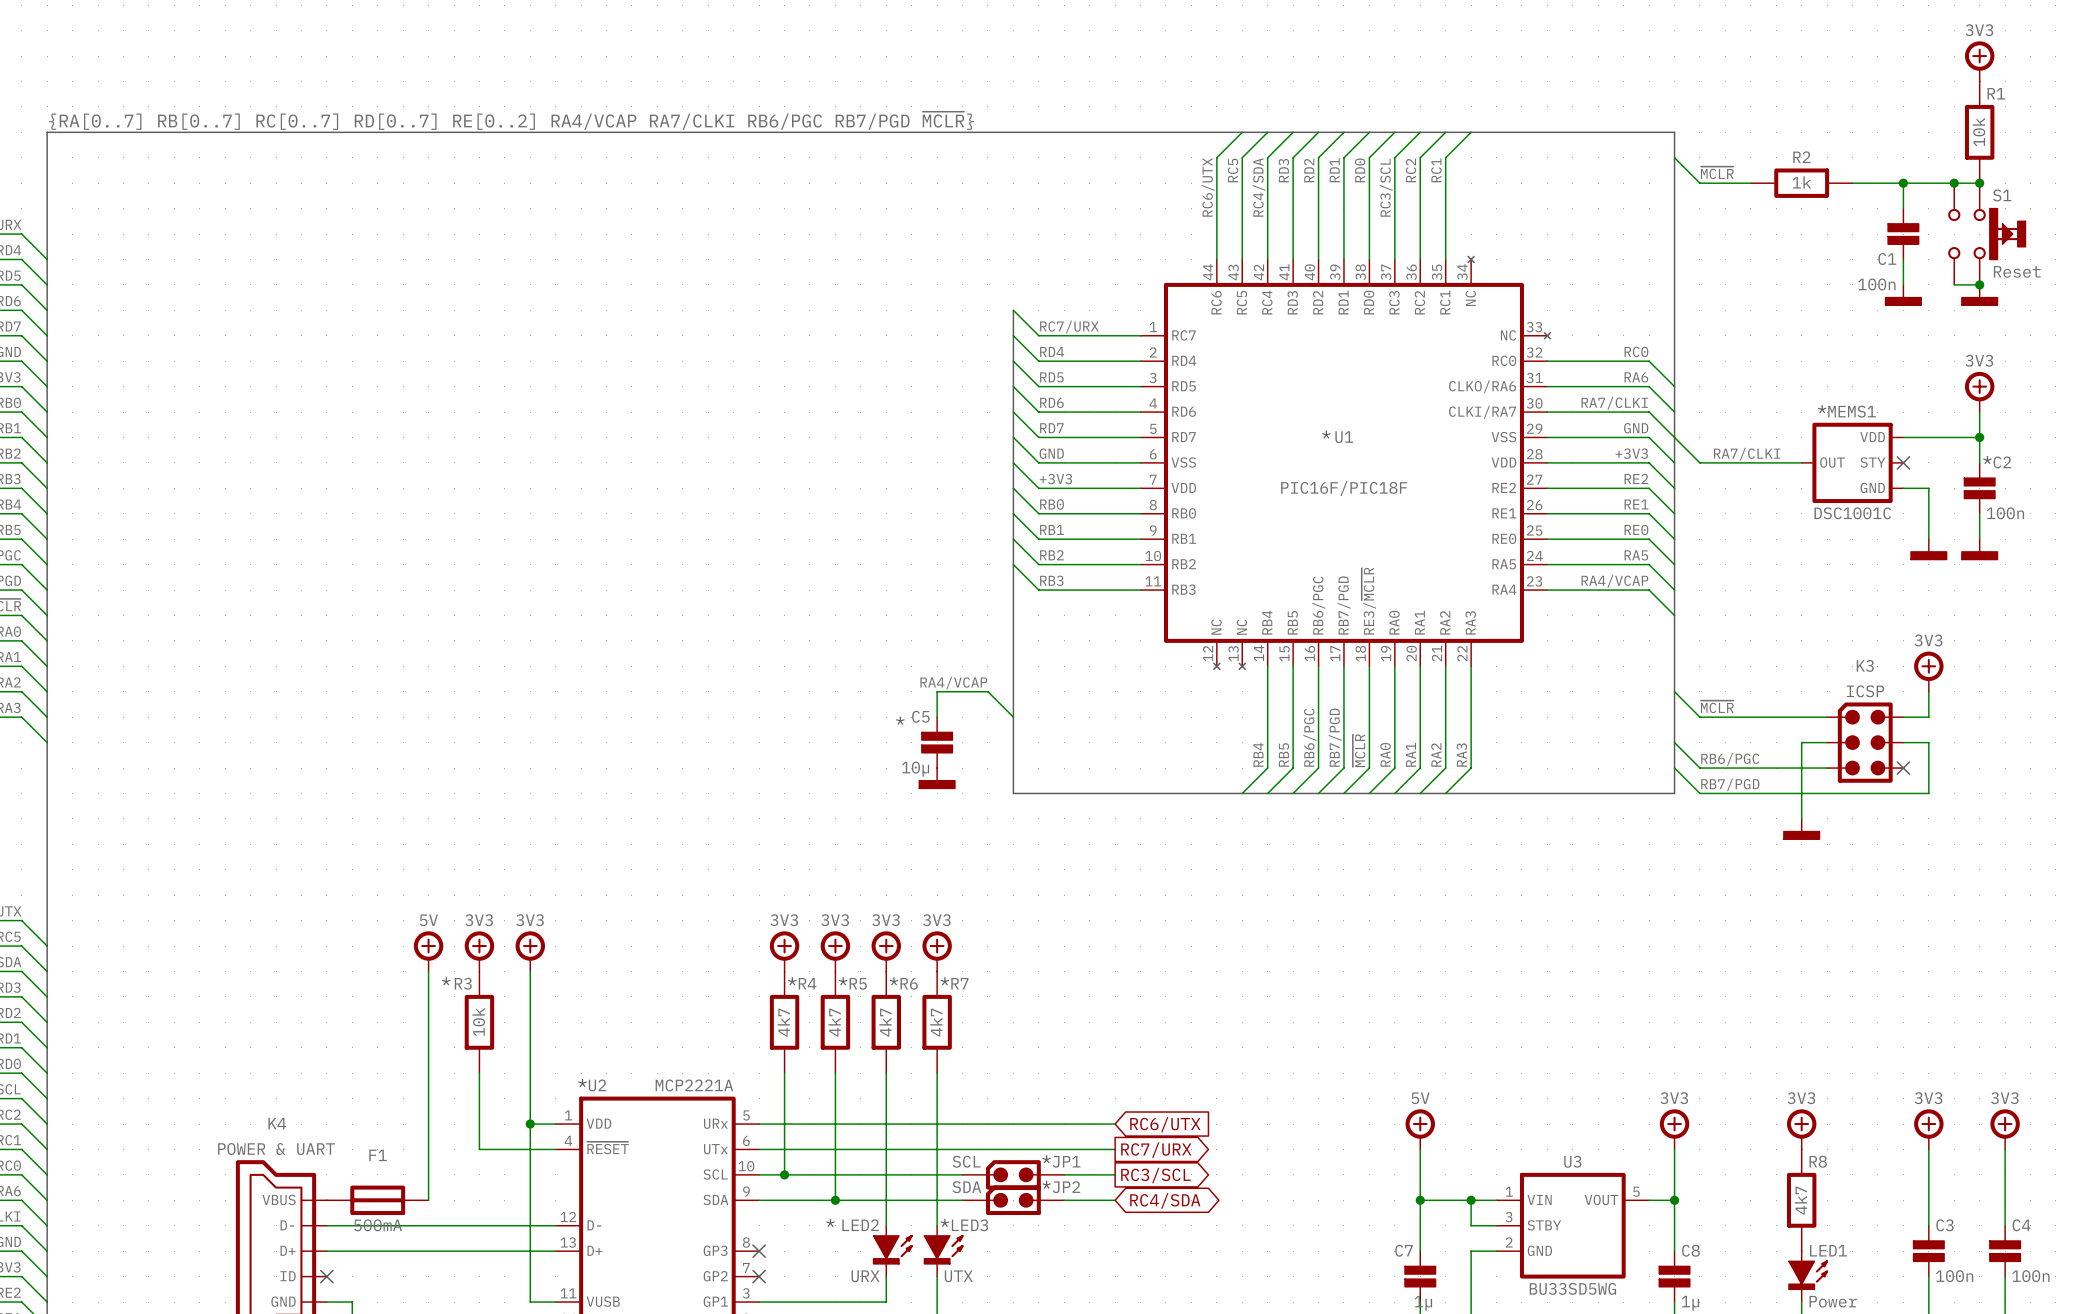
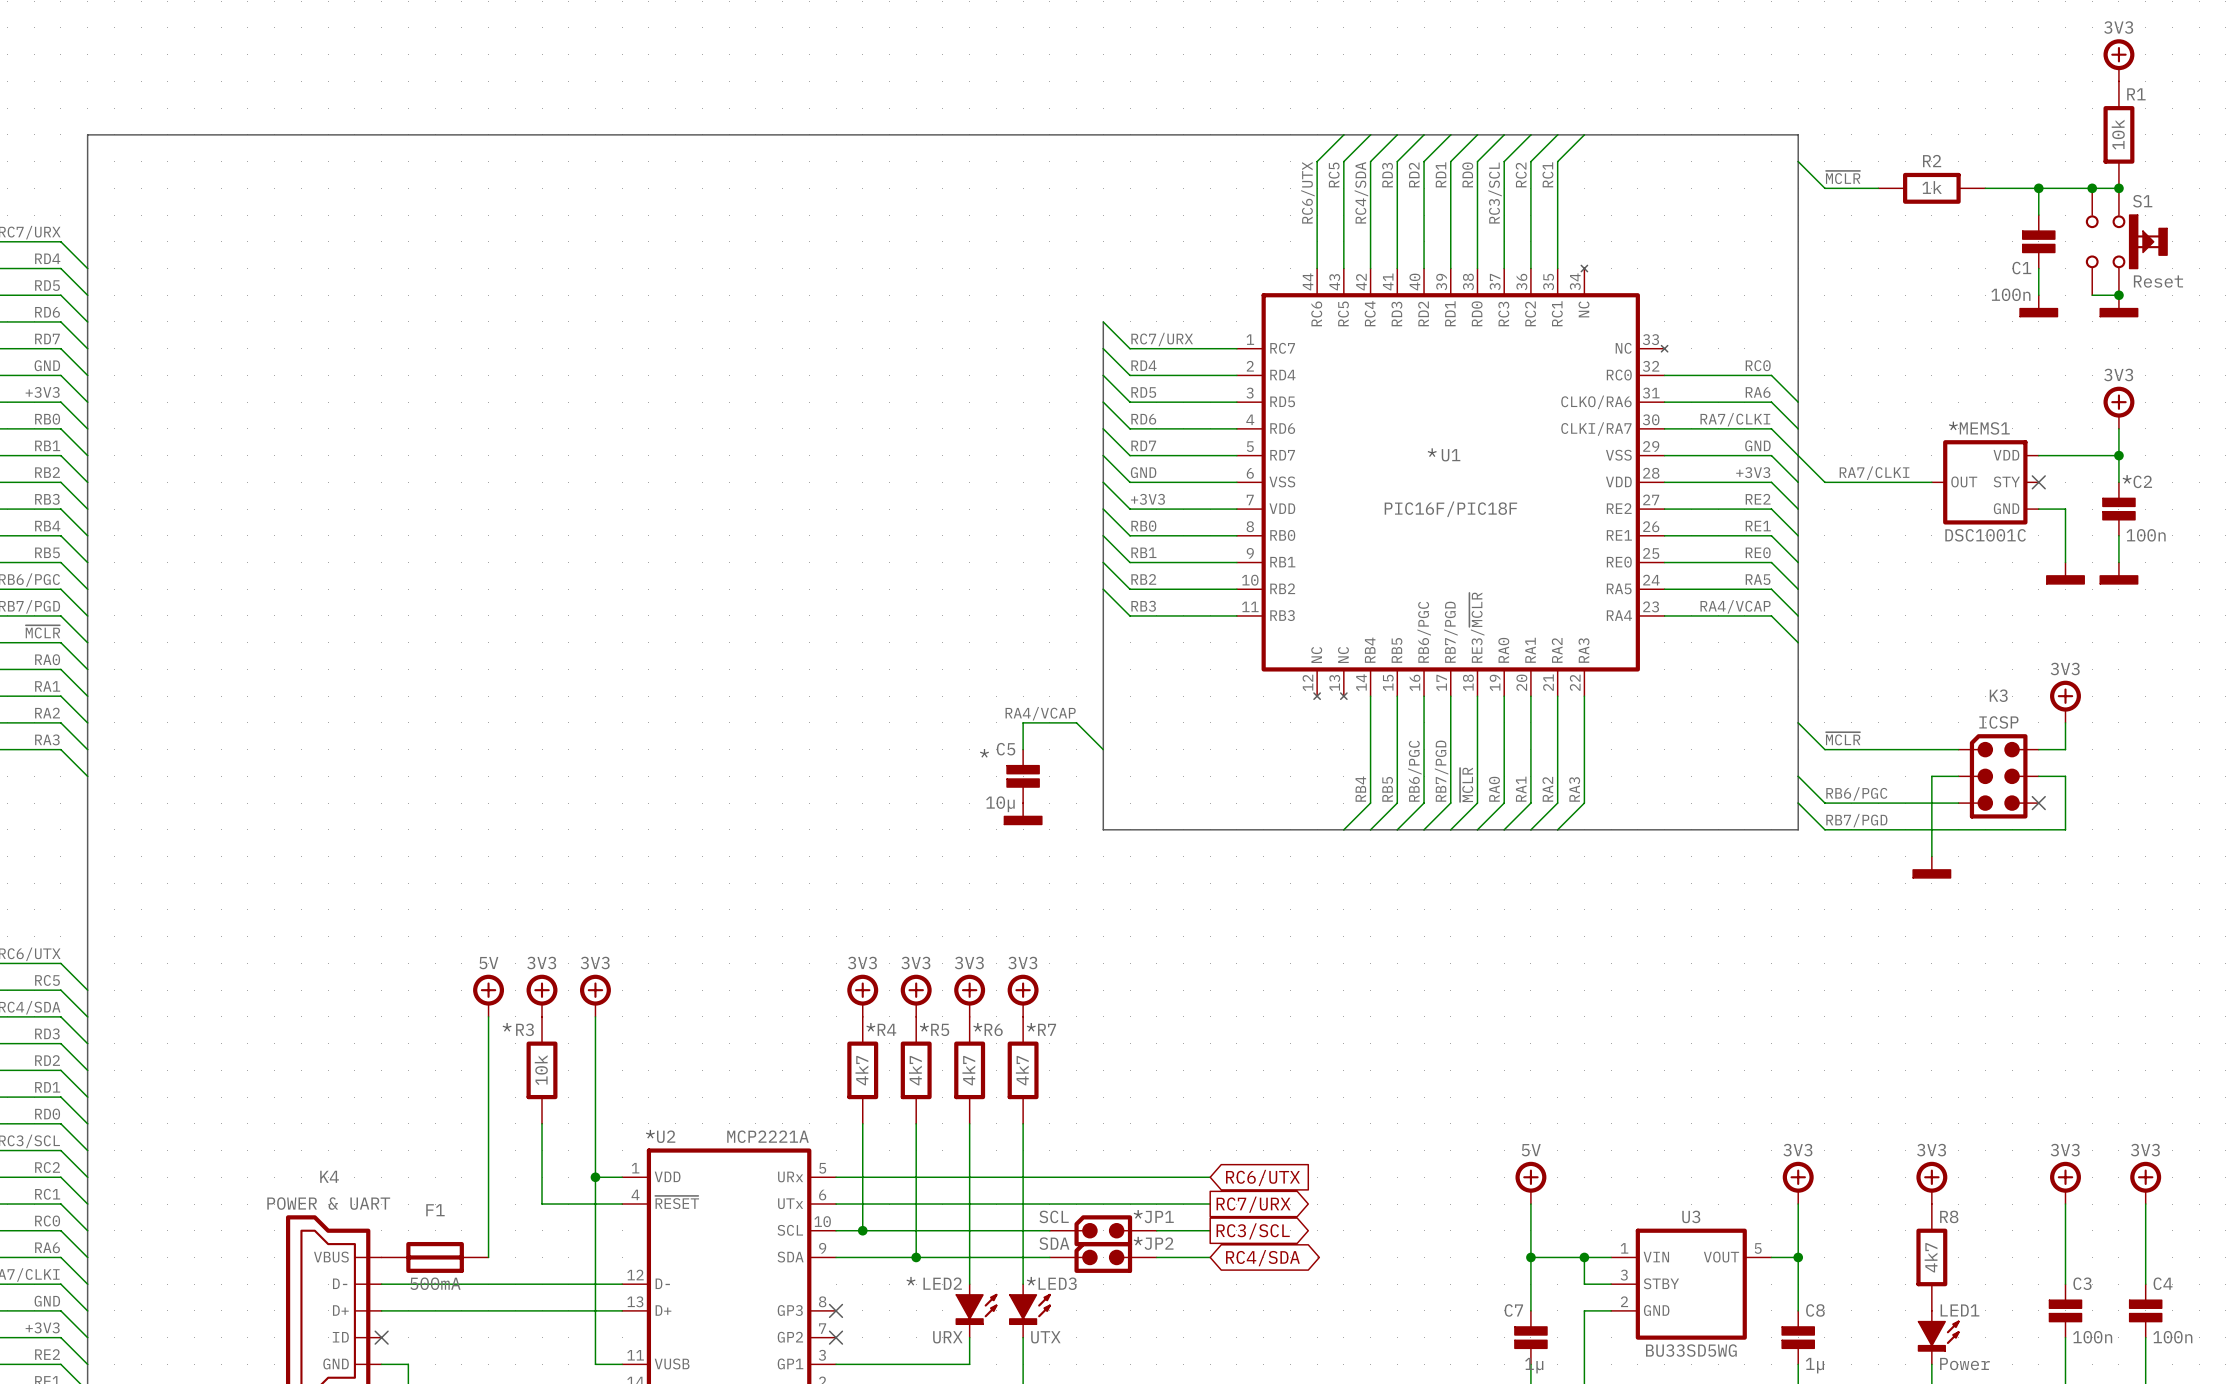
label: {RA[0..7] RB[0..7] RC[0..7] RD[0..7] RE[0..2] RA4/VCAP RA7/CLKI RB6/PGC RB7/PGD ~{MCLR}} (511, 120) -> none

